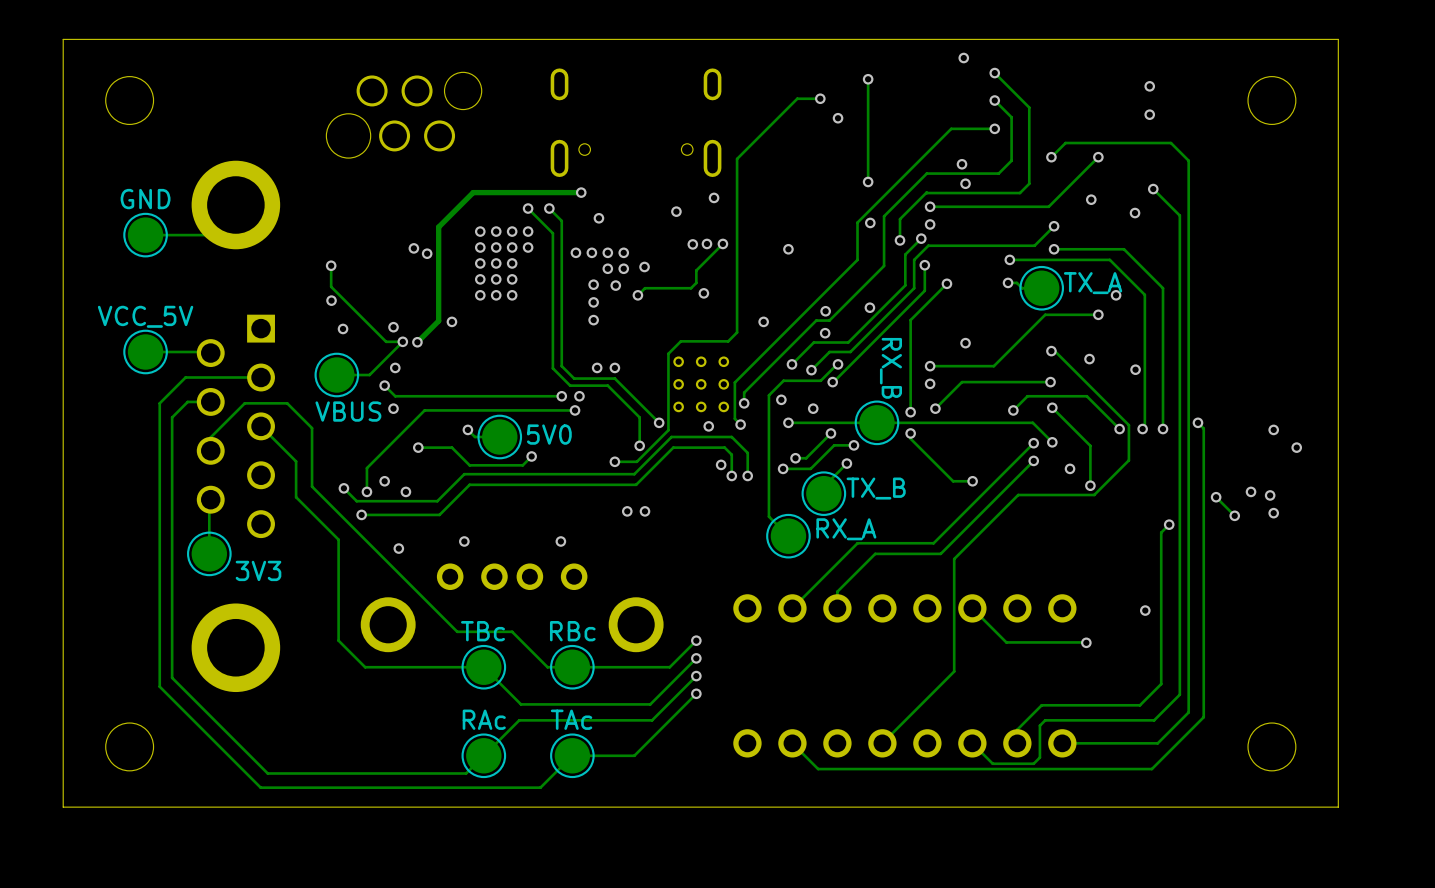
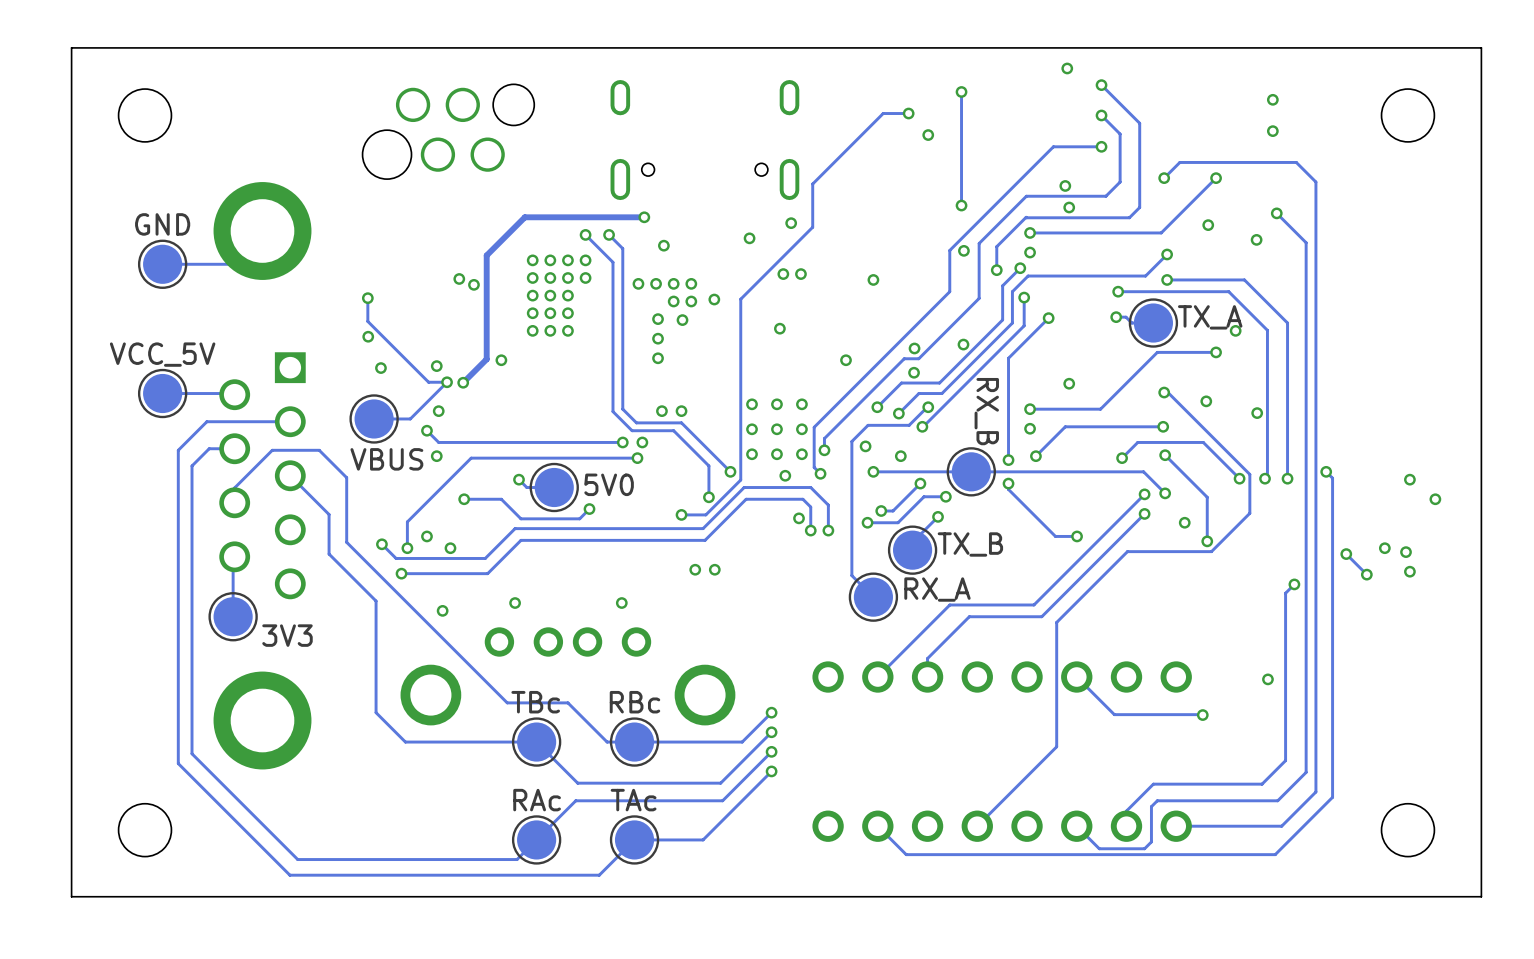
track: (737, 158) (737, 332) (728, 341) (680, 341) (668, 353) -> (816, 180) (812, 184) (812, 227) (740, 299) (740, 395)
track: (722, 243) (696, 270) (696, 282) (691, 288) (644, 288) (637, 295) -> none
via: (692, 244) -> none
via: (637, 295) -> none

